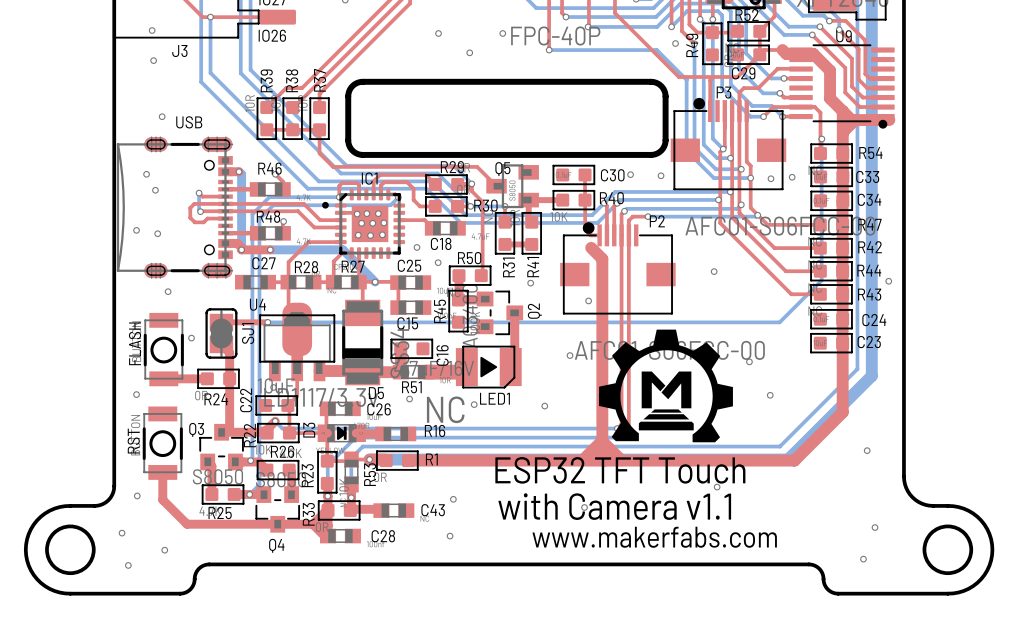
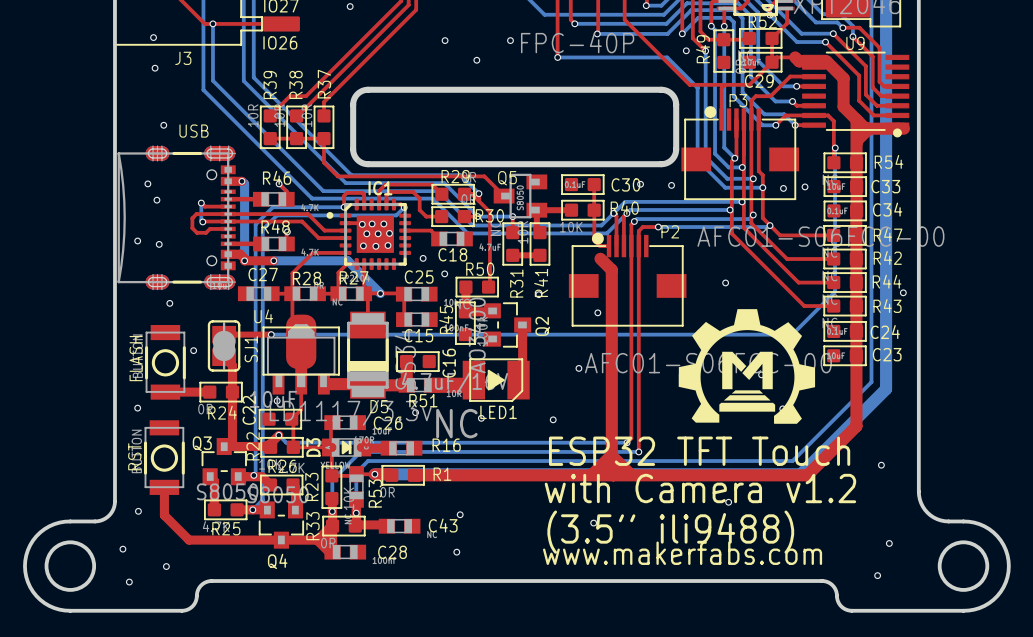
drawing position: (665, 385) -> (746, 366)
text position: ESP32 TFT Touch (620, 470) -> ESP32 TFT Touch (699, 451)
text: with Camera v1.1 (614, 506) -> with Camera v1.2 (700, 488)
text: none -> (3.5'' ili9488) (670, 532)

